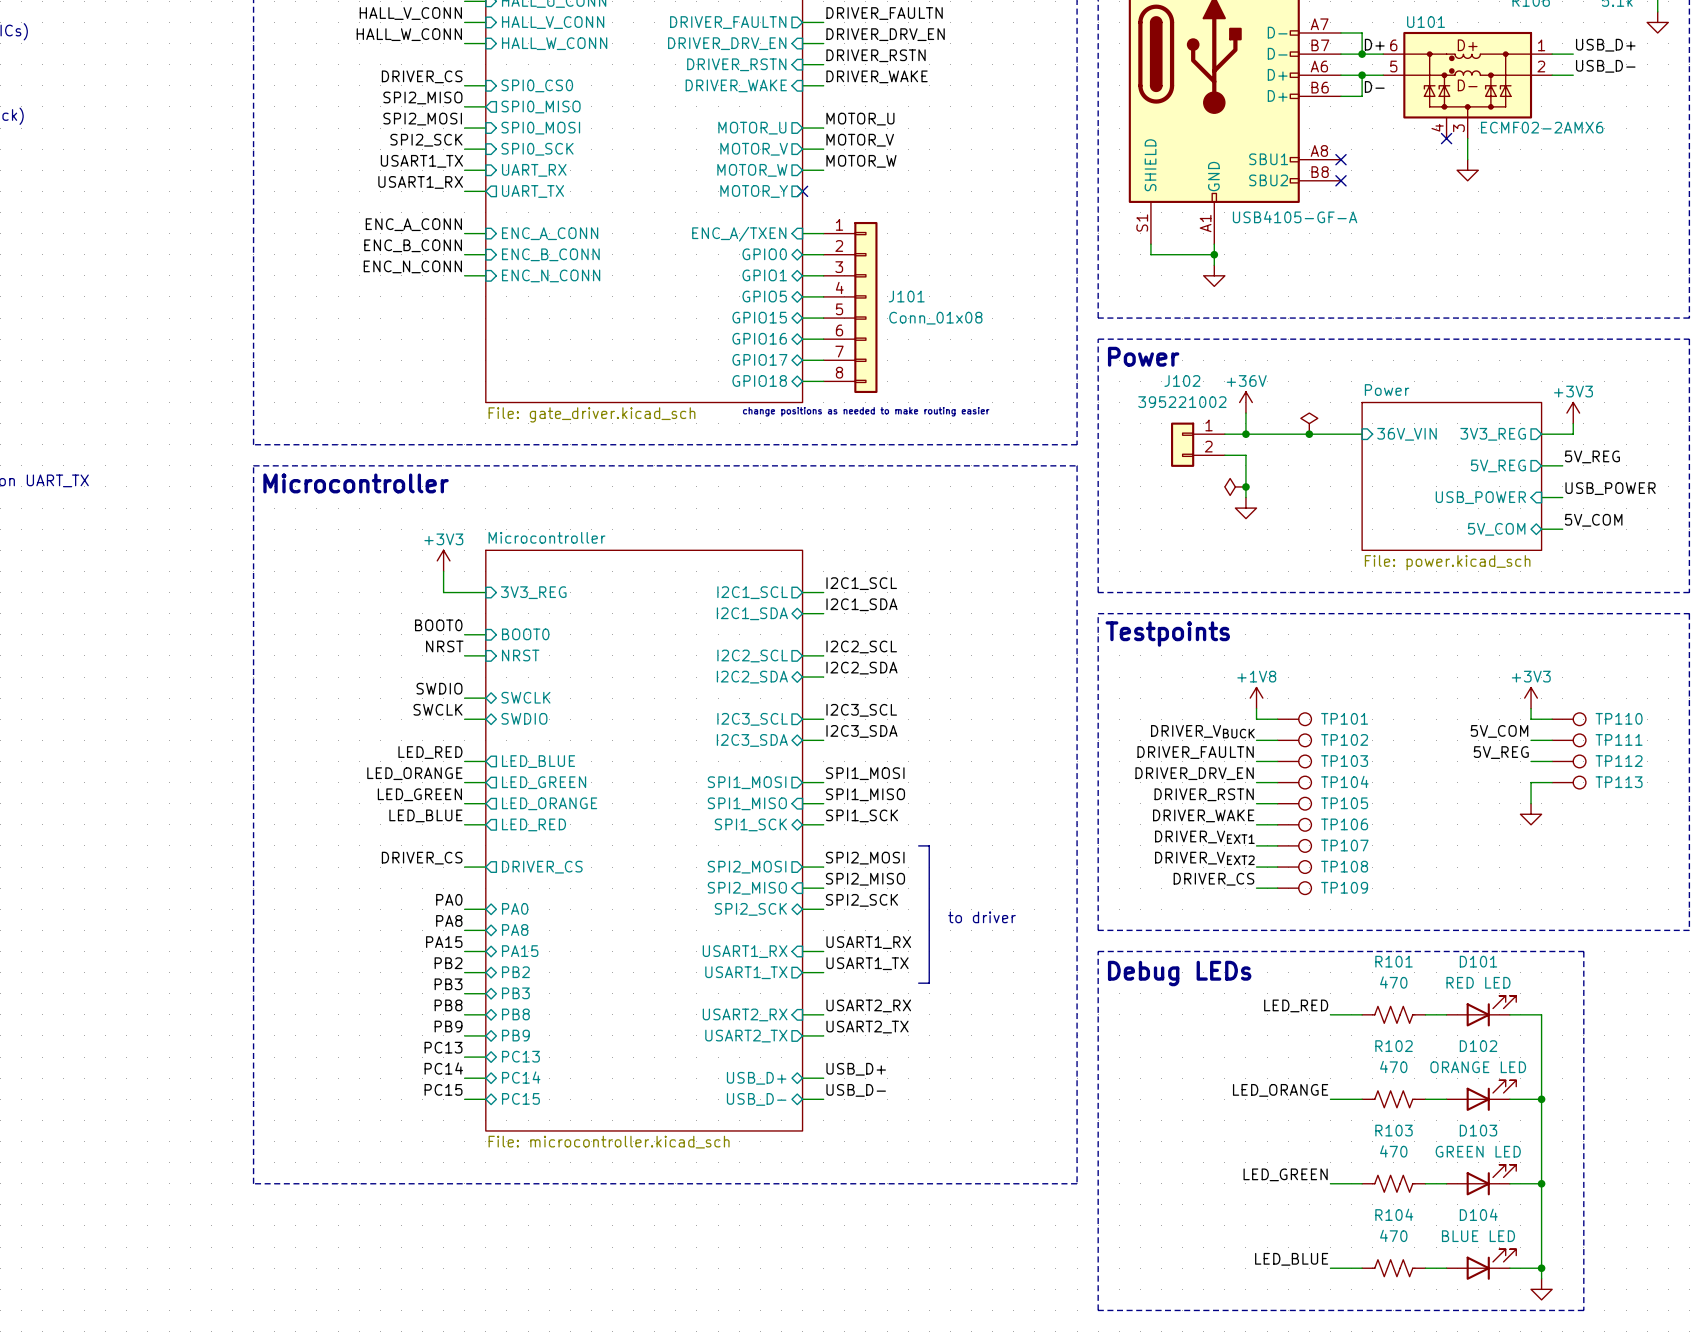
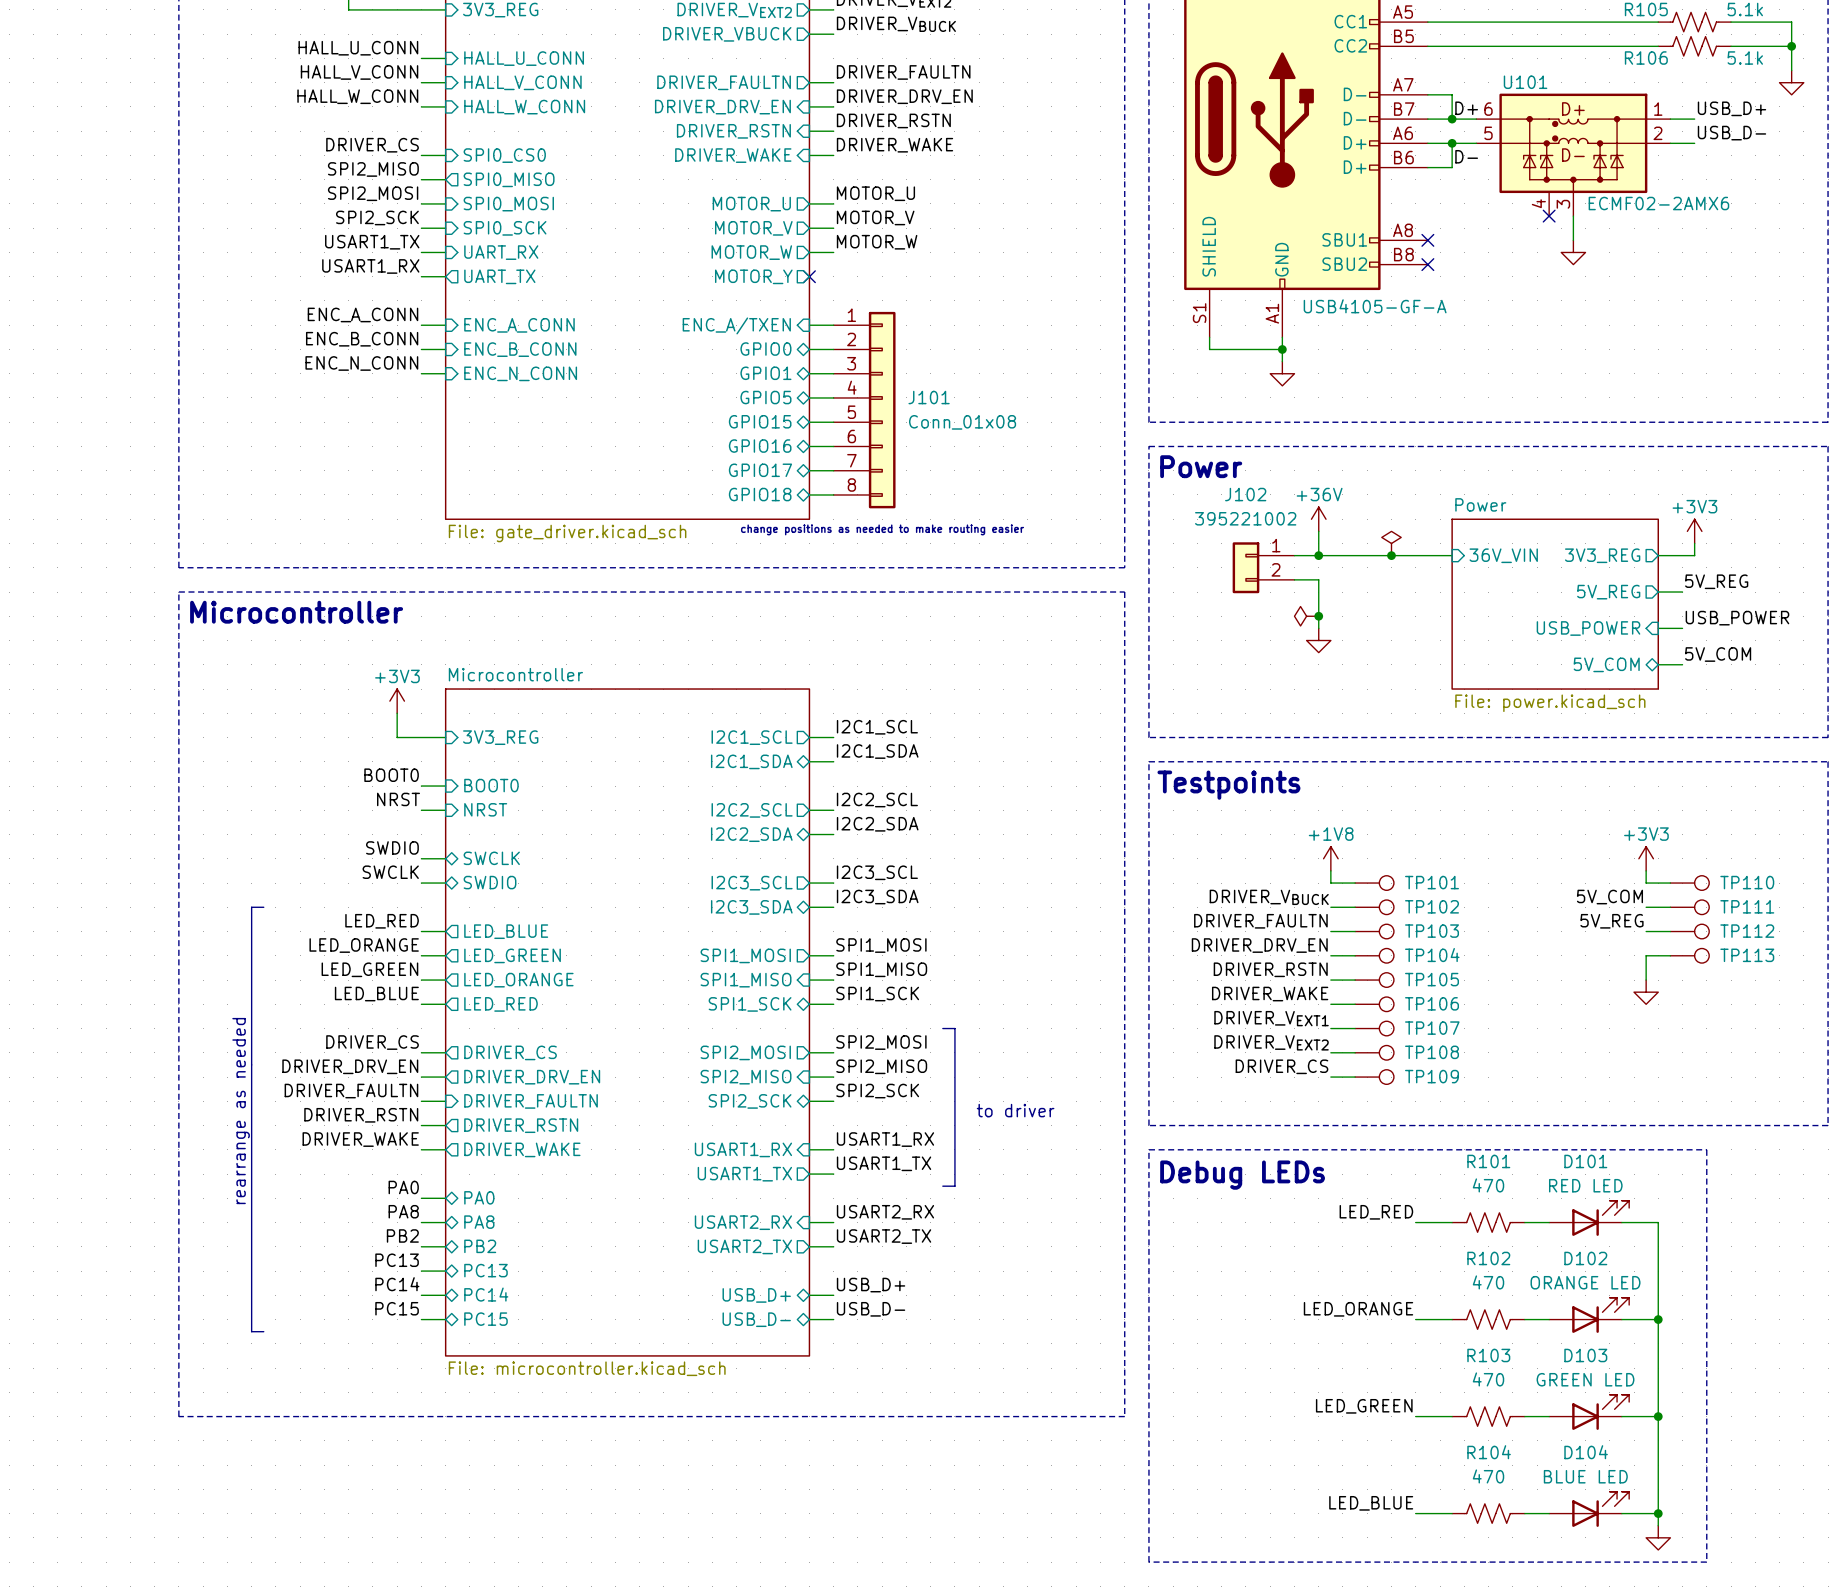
line: none -> (263, 907) (251, 907) (251, 1331) (263, 1331)
label: none -> DRIVER_DRV_EN (350, 1066)
sheet pin: none -> DRIVER_DRV_EN (532, 1077)
label: PA0 (449, 899) -> DRIVER_FAULTN (351, 1091)
sheet pin shape: bidirectional (515, 908) -> input (531, 1101)
sheet pin: PA0 (515, 908) -> DRIVER_FAULTN (531, 1101)
text: none -> rearrange as needed (241, 1111)
label: PA8 (449, 920) -> DRIVER_RSTN (361, 1115)
sheet pin shape: bidirectional (515, 929) -> output (521, 1125)
sheet pin: PA8 (515, 929) -> DRIVER_RSTN (521, 1125)
label: PA15 (444, 942) -> DRIVER_WAKE (360, 1139)
sheet pin shape: bidirectional (520, 951) -> output (522, 1149)
sheet pin: PA15 (520, 951) -> DRIVER_WAKE (522, 1149)
label: PB2 (448, 963) -> none
wire: (464, 972) (485, 972) -> (421, 1077) (445, 1077)
sheet pin: PB2 (515, 972) -> none
label: PB3 (448, 984) -> PA0 (403, 1187)
sheet pin: PB3 (515, 993) -> PA0 (479, 1197)
label: PB8 (448, 1005) -> PA8 (403, 1211)
sheet pin: PB8 (515, 1014) -> PA8 (479, 1222)
label: PB9 (448, 1026) -> PB2 (402, 1235)
sheet pin: PB9 (515, 1035) -> PB2 (480, 1246)

